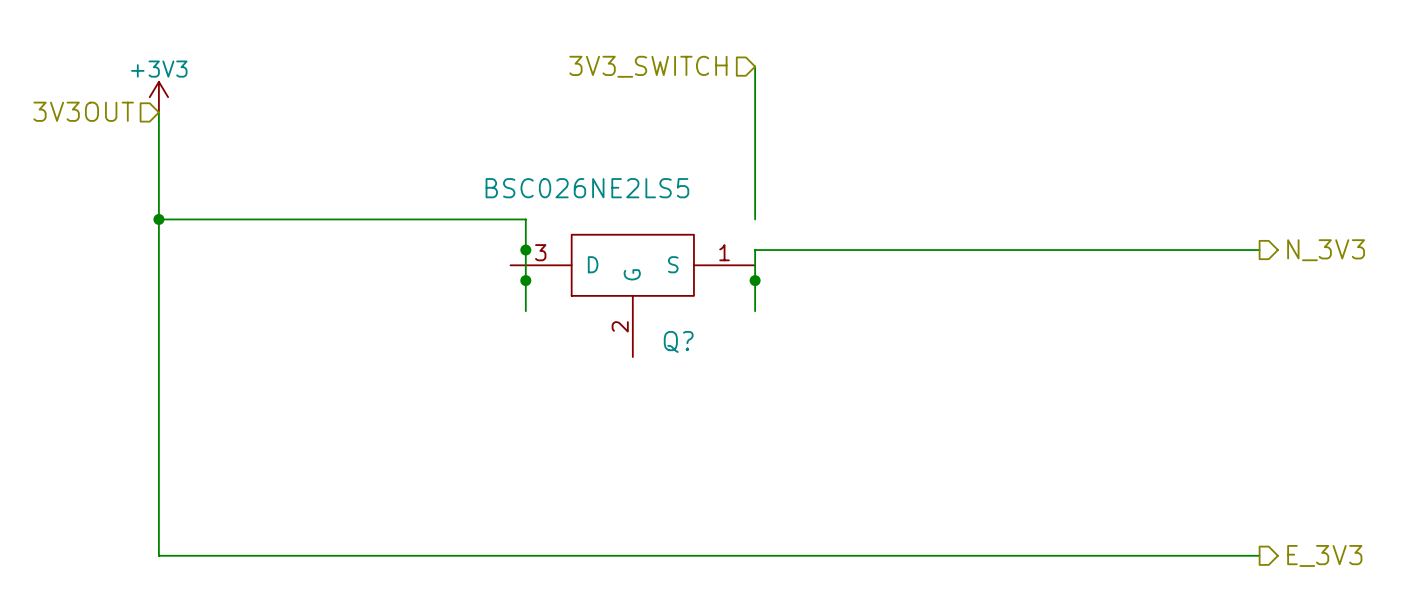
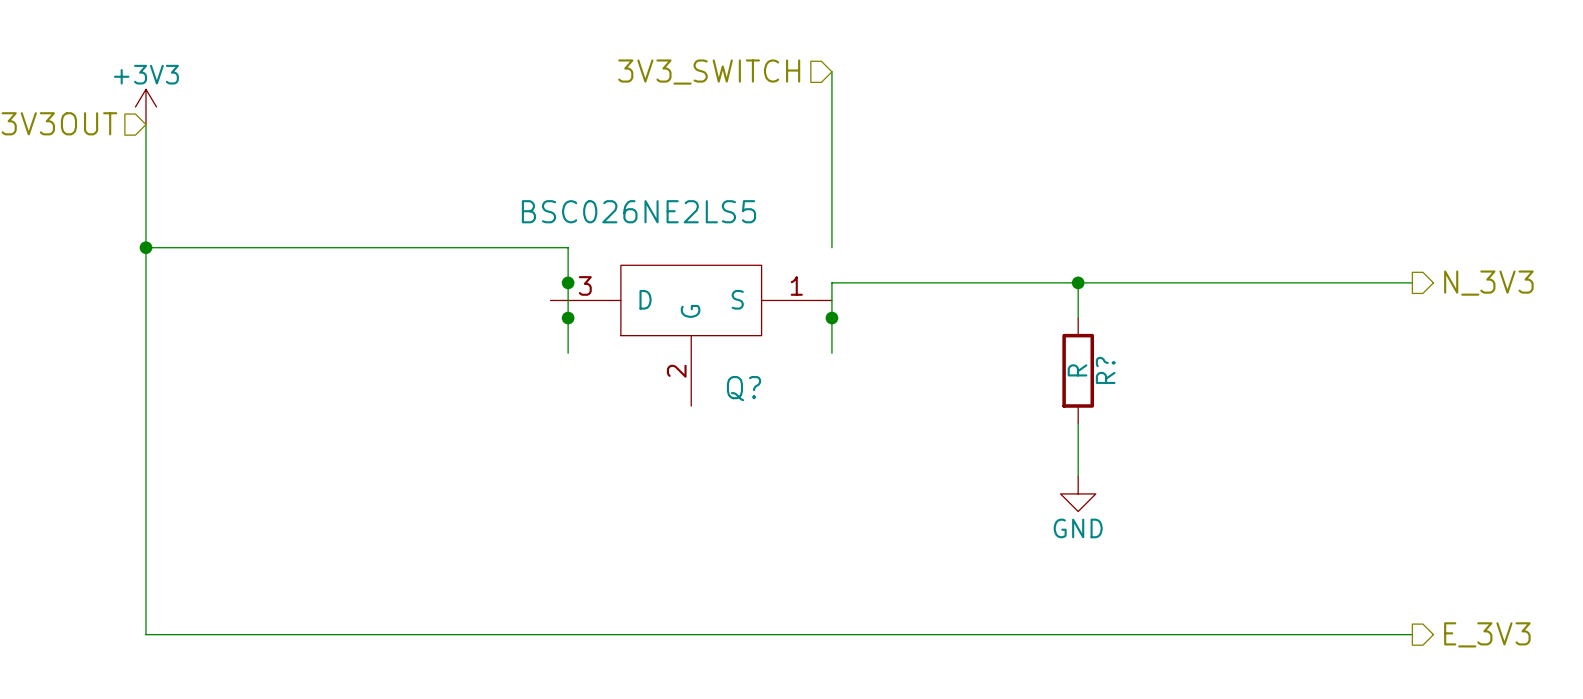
wire: none -> (1078, 282) (1078, 318)
junction: none -> (1078, 282)
R?: none -> R (1078, 370)
wire: none -> (1078, 423) (1078, 476)
power symbol: none -> GND (1078, 493)

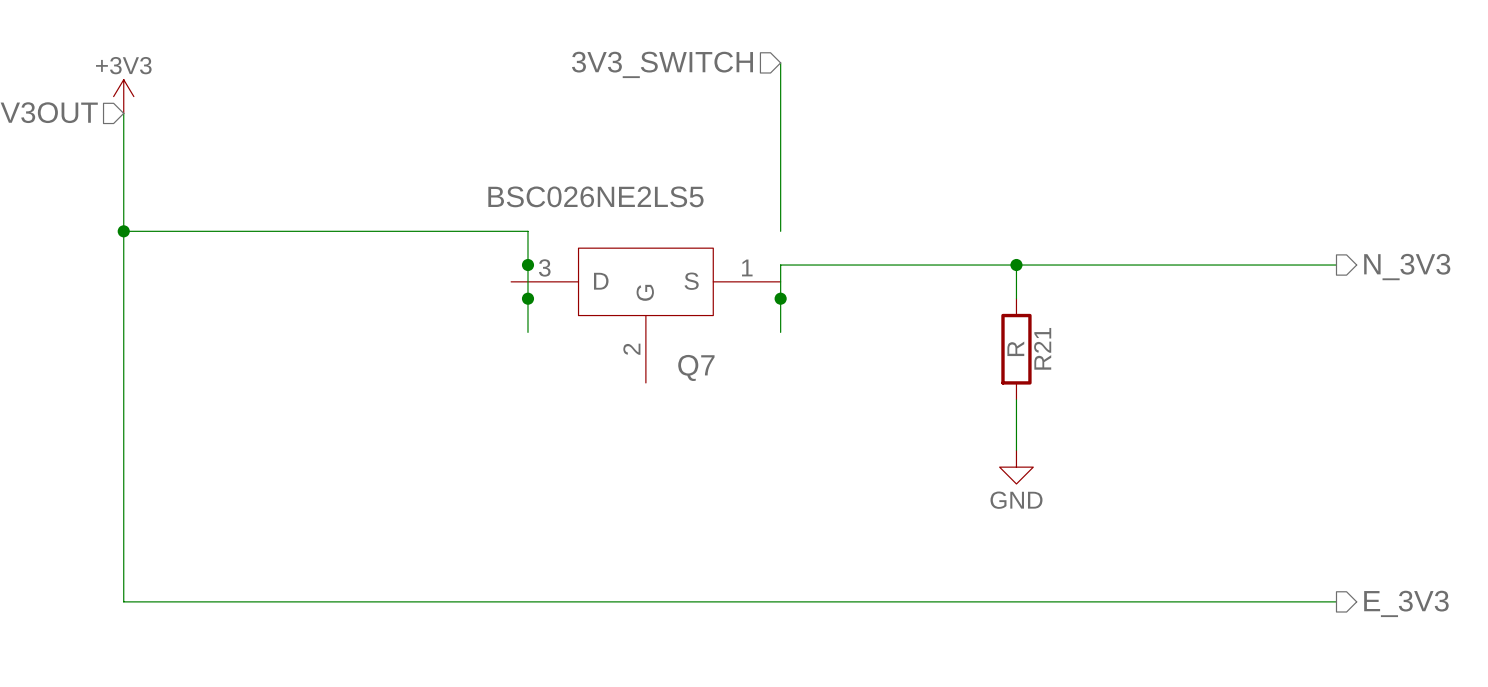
R? name: R? (1105, 370) -> R21 (1042, 348)
Q? name: Q? (744, 388) -> Q7 (696, 367)

